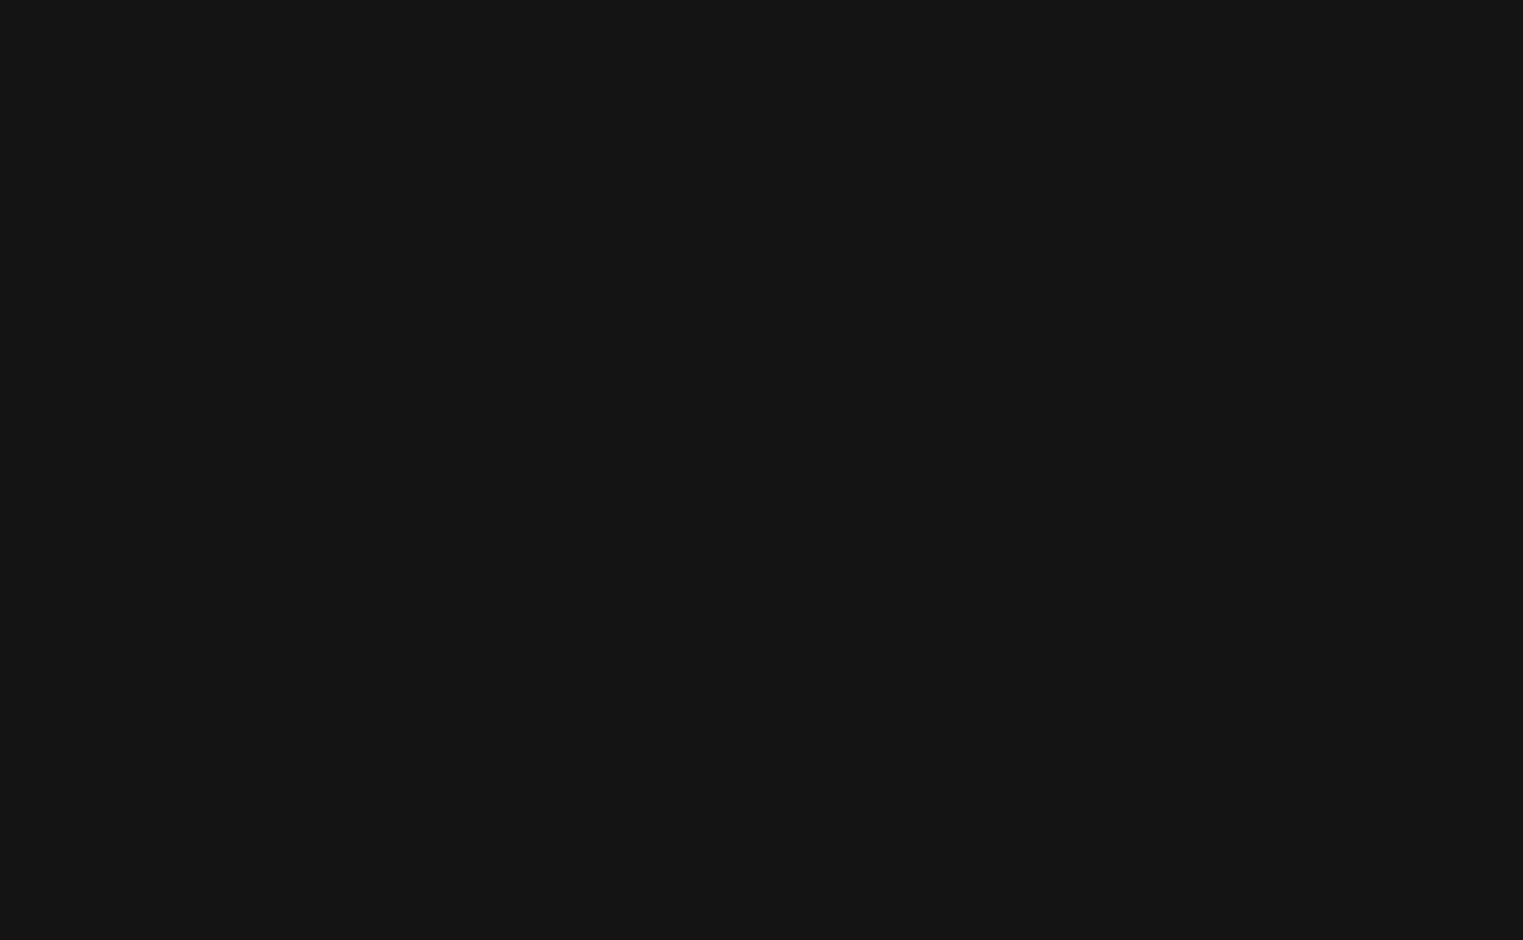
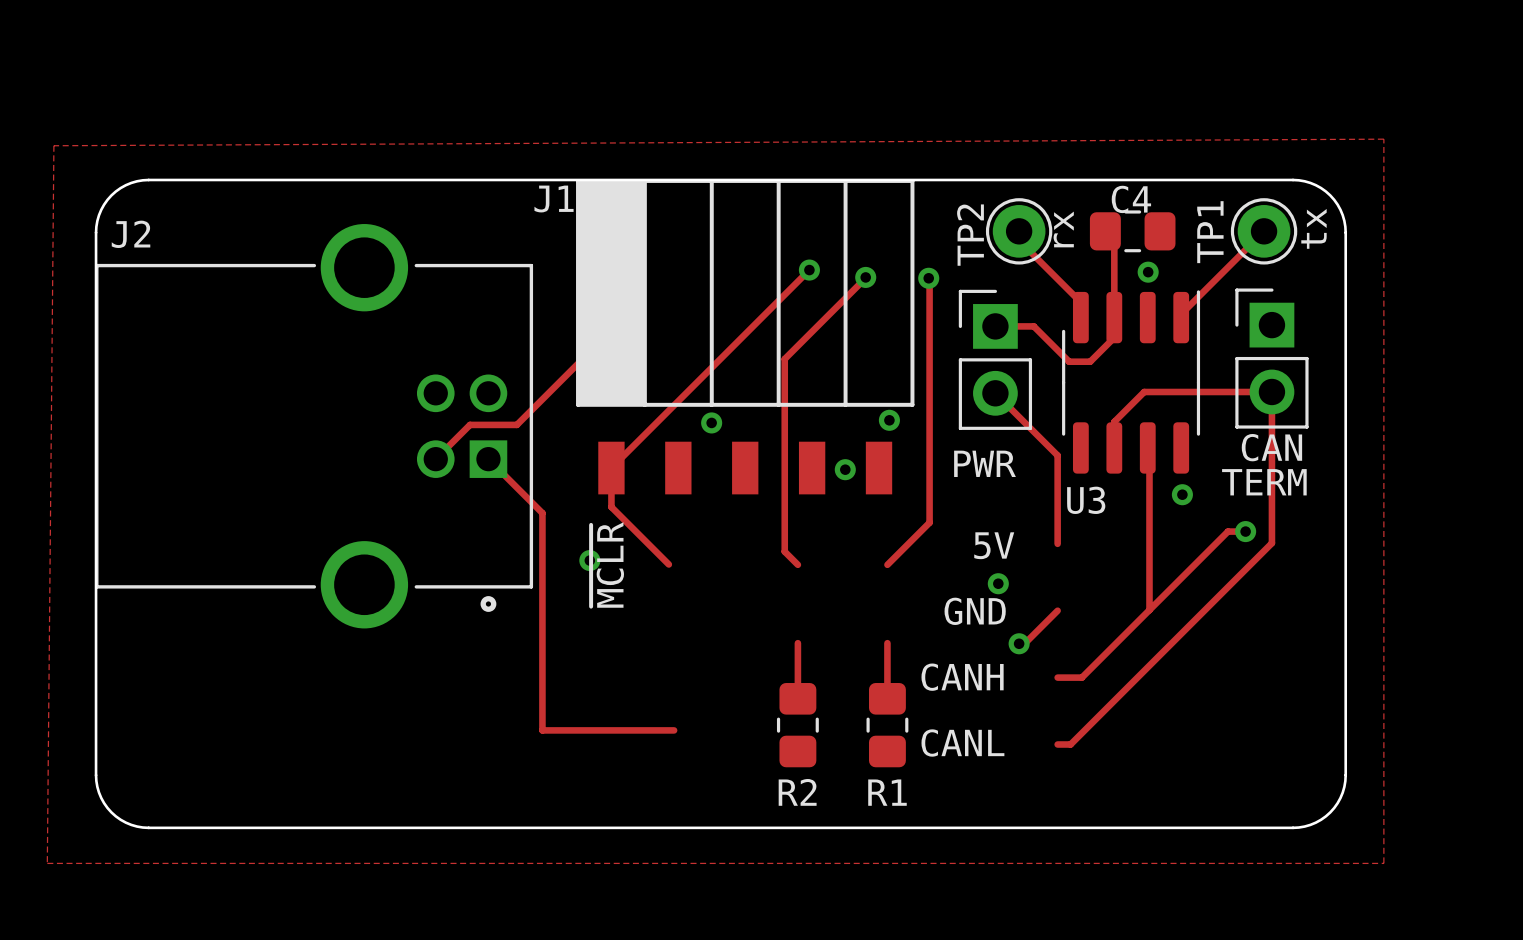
zone outline: none -> (1383, 139) (1383, 863) (47, 863) (53, 145) (1383, 139)
board edge: none -> (148, 179) (1293, 179) (1315, 185) (1325, 191) (1337, 204) (1342, 215) (1345, 232) (1345, 775) (1340, 798) (1330, 812) (1321, 819) (1304, 826) (1293, 827) (148, 827) (125, 822) (111, 812) (104, 803) (97, 786) (96, 775) (96, 232) (101, 209) (111, 195) (131, 182) (148, 179)
text: none -> C4 (1131, 199)
track: none -> (1007, 228) (1080, 302) (1080, 317)
text: none -> tx (1313, 228)
TP2: none -> (1019, 231)
text: none -> rx (1063, 229)
track: none -> (1105, 231) (1114, 240) (1114, 337) (1090, 361) (1069, 361) (1033, 326) (995, 326)
part: none -> (1132, 231)
track: none -> (1264, 231) (1181, 314) (1181, 317)
TP1: none -> (1264, 231)
track: none -> (809, 270) (611, 468) (611, 507) (668, 564)
via: none -> (809, 270)
via: none -> (1148, 272)
track: none -> (865, 277) (784, 359) (784, 551) (797, 564)
via: none -> (865, 277)
track: none -> (928, 278) (929, 522) (887, 564)
via: none -> (928, 278)
track: none -> (620, 288) (620, 321) (516, 424) (470, 424) (435, 459)
J1: none -> (745, 336)
CAN: none -> (1271, 358)
part: none -> (995, 359)
U3: none -> (1131, 381)
track: none -> (995, 393) (1057, 455) (1057, 543)
via: none -> (889, 420)
via: none -> (711, 422)
J2: none -> (314, 426)
track: none -> (1114, 447) (1114, 421) (1144, 391) (1271, 391) (1271, 543) (1070, 744) (1057, 744)
track: none -> (1147, 447) (1149, 449) (1149, 610)
track: none -> (488, 459) (542, 513) (542, 730) (674, 730)
text: none -> PWR (985, 463)
via: none -> (845, 469)
text: none -> TERM (1264, 482)
via: none -> (1182, 494)
track: none -> (1245, 531) (1227, 531) (1081, 677) (1057, 677)
via: none -> (1245, 531)
text: none -> 5V (994, 545)
text: none -> ~{MCLR} (607, 565)
via: none -> (589, 560)
via: none -> (998, 583)
track: none -> (1057, 610) (1024, 643) (1019, 643)
text: none -> GND (975, 611)
track: none -> (797, 643) (797, 698)
track: none -> (887, 643) (887, 698)
via: none -> (1019, 643)
text: none -> CANH (962, 677)
R2: none -> (797, 725)
R1: none -> (887, 725)
text: none -> CANL (962, 743)

